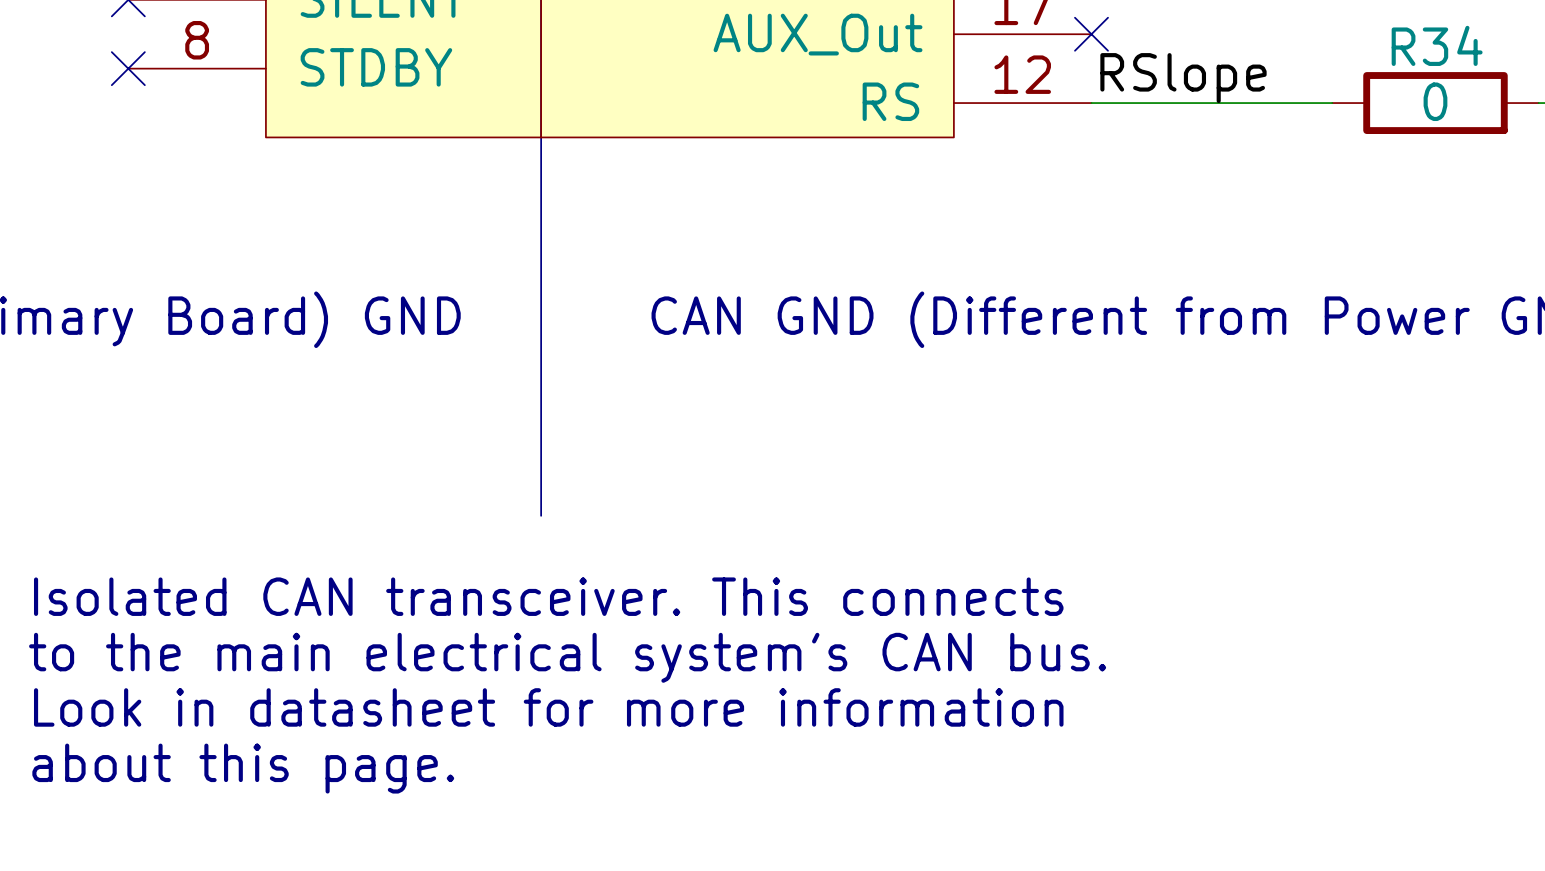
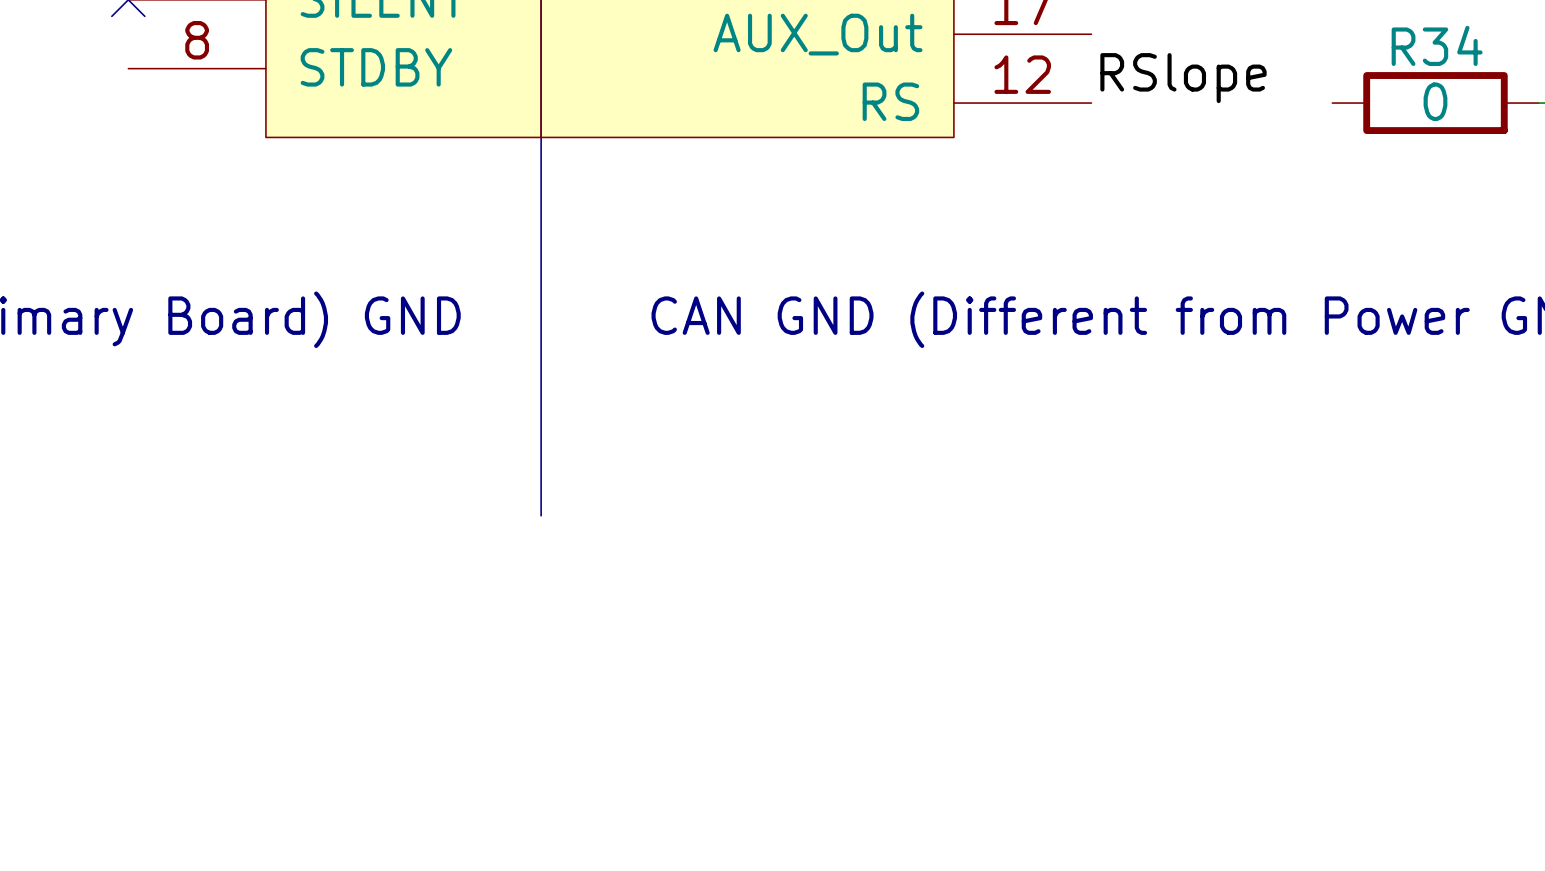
no-connect mark: (1091, 34) -> none
no-connect mark: (128, 68) -> none
wire: (1091, 103) (1332, 103) -> none
text: Isolated CAN transceiver. This connects (548, 596) -> none
text: to the main electrical system's CAN bus. (567, 657) -> none
text: Look in datasheet for more information (548, 707) -> none
text: about this page. (243, 768) -> none

